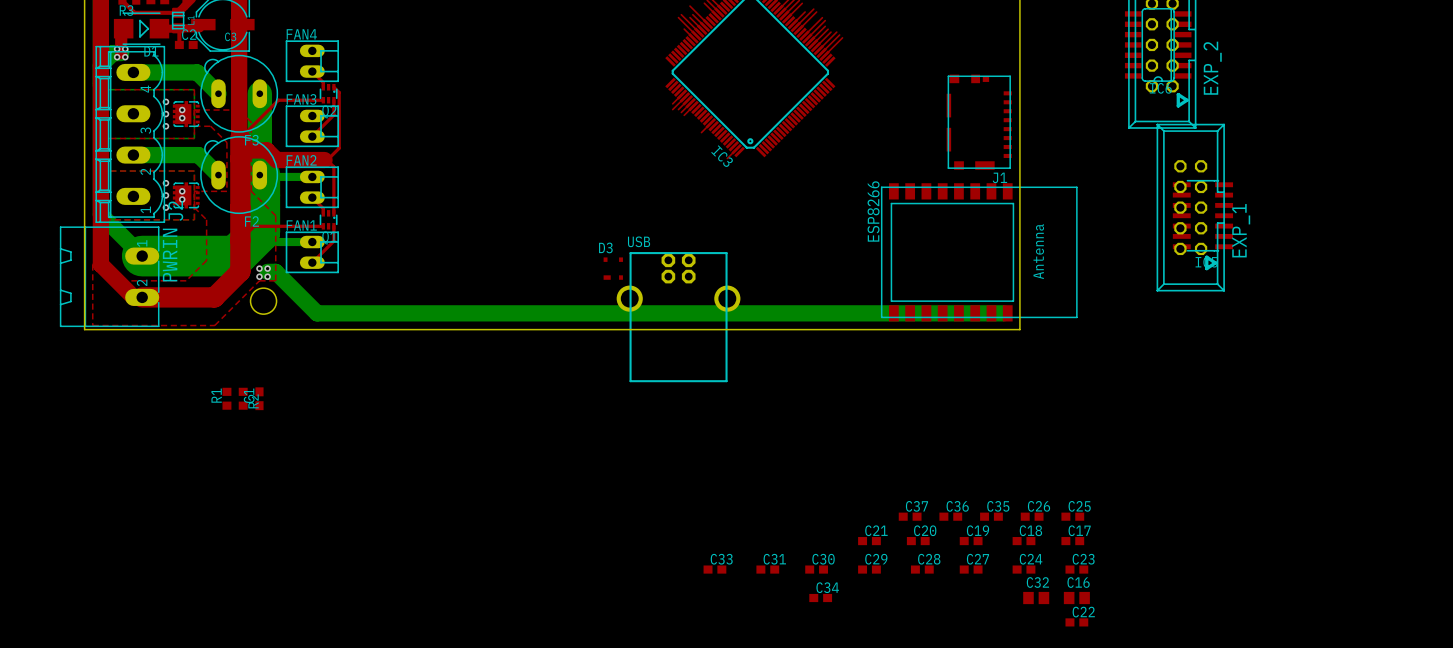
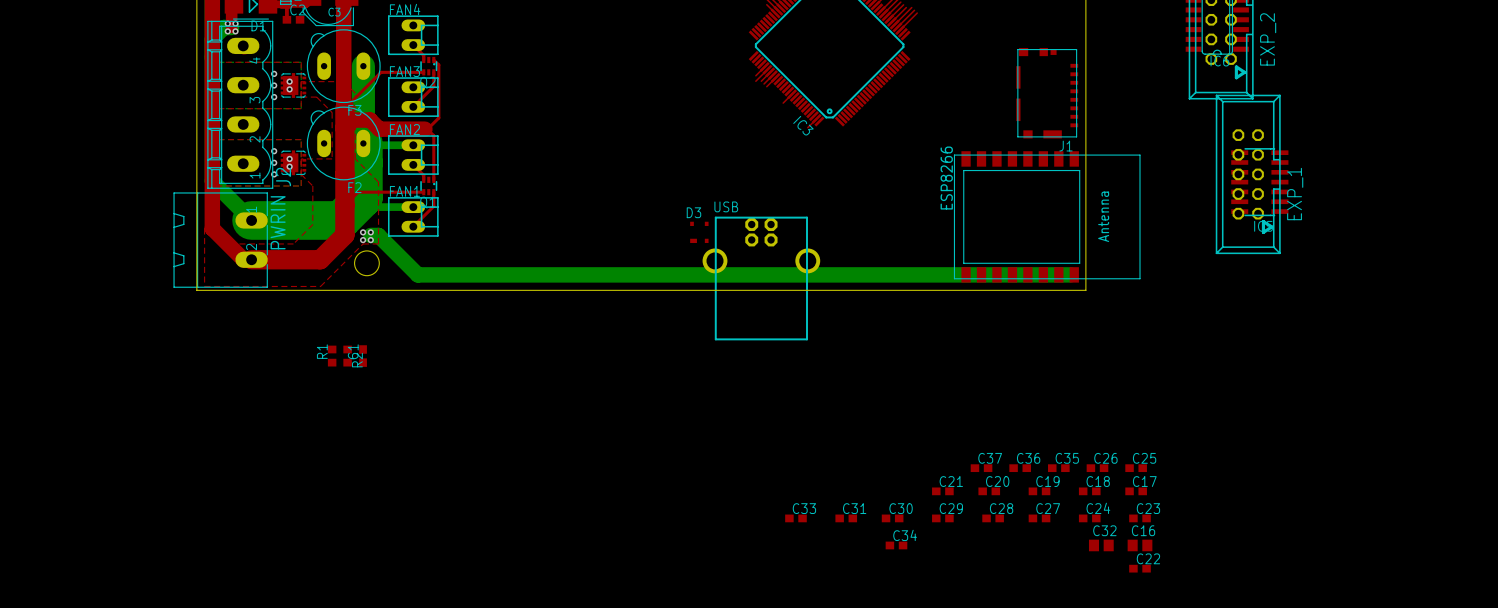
bottom track: (133, 72) (197, 72) (218, 93) -> none
bottom track: (133, 155) (198, 155) (218, 175) -> none

